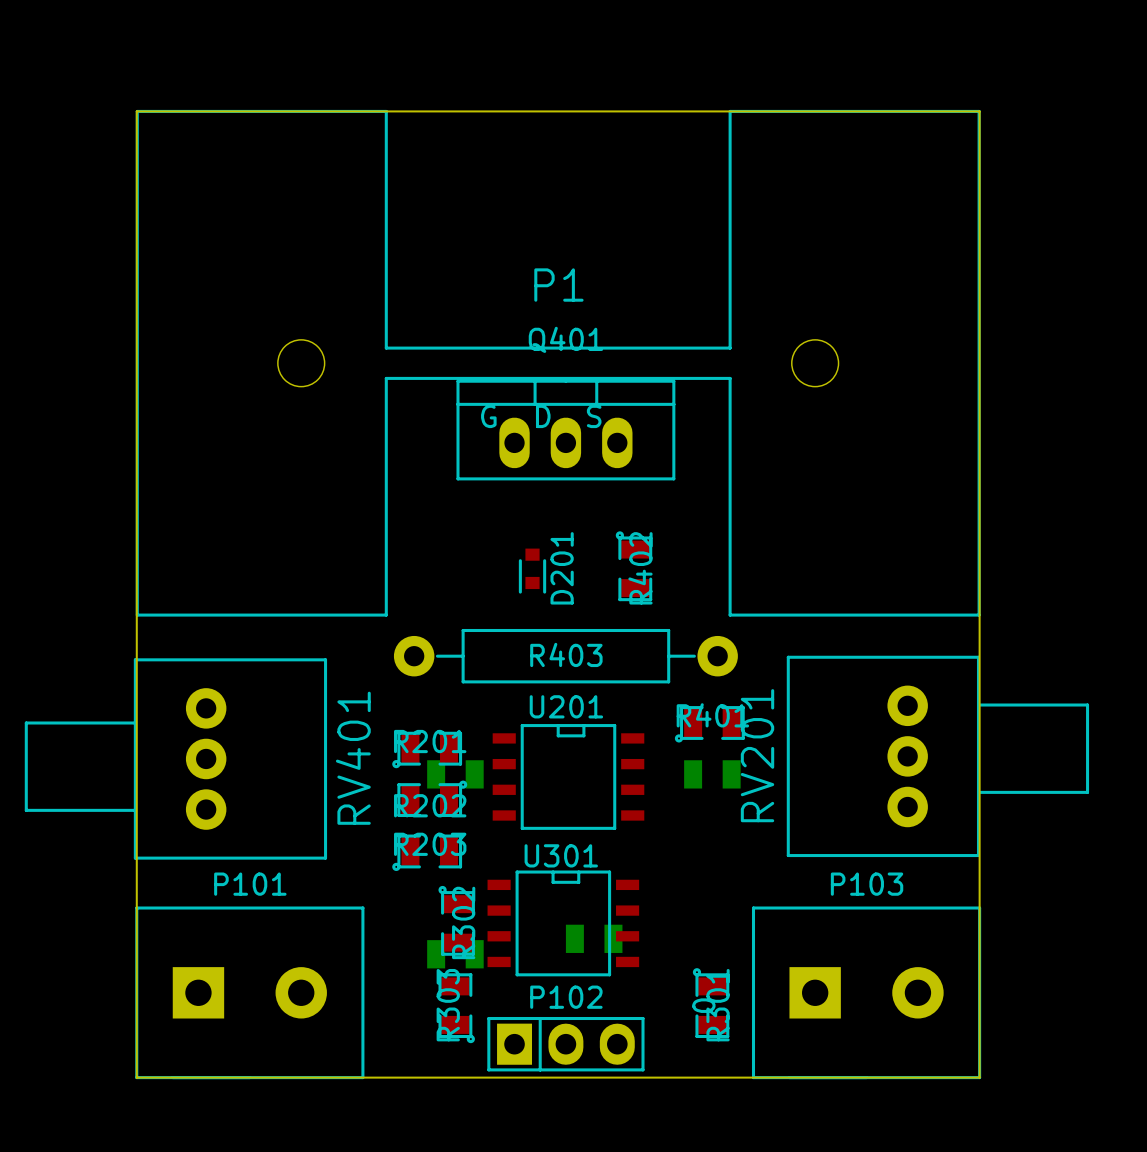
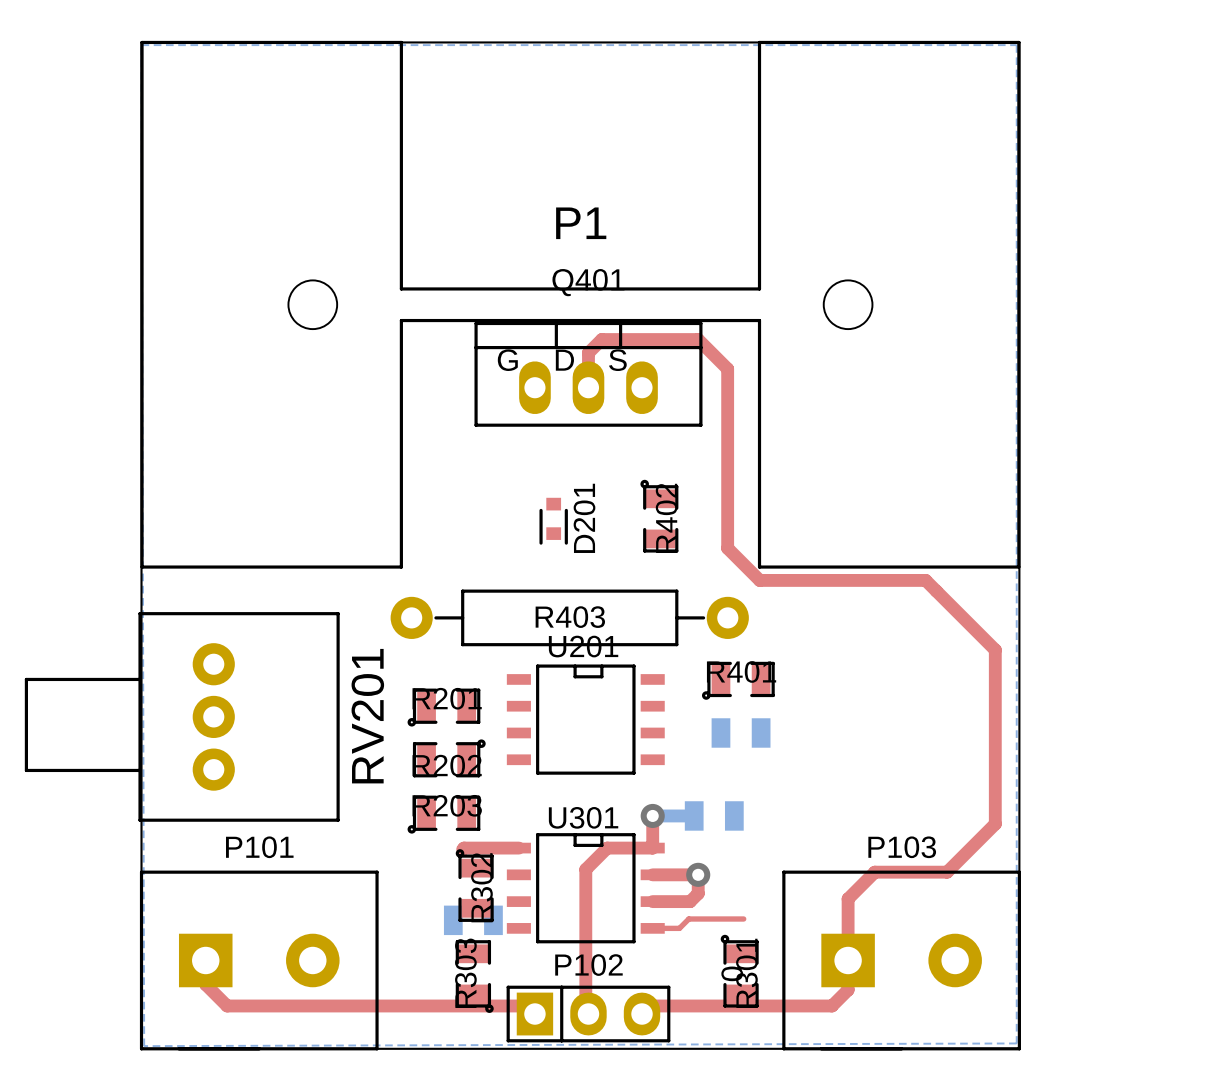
bottom zone outline: none -> (141, 45) (144, 1046) (1016, 1043) (1016, 45) (141, 45)
top track: none -> (588, 387) (588, 352) (601, 339) (698, 339) (727, 368) (727, 548) (759, 580) (925, 580) (995, 650) (995, 823) (947, 872) (874, 872) (848, 898) (848, 989) (832, 1005) (639, 1005)
R403 position: (565, 656) -> (569, 617)
RV201: (937, 756) -> none
RV401 name: RV401 (353, 758) -> RV201 (367, 716)
part: (455, 774) -> none
U201 position: (568, 776) -> (585, 719)
top track: none -> (652, 815) (652, 848) (607, 848) (585, 869) (585, 1005)
bottom track: none -> (652, 815) (694, 815)
via: none -> (652, 815)
part: none -> (714, 815)
top track: none -> (518, 848) (462, 849)
top track: none -> (652, 874) (698, 874) (698, 893) (690, 901) (652, 901)
via: none -> (698, 874)
part: (594, 938) -> none
top track: none -> (743, 919) (688, 919) (679, 928) (652, 928)
top track: none -> (205, 960) (205, 984) (227, 1005) (532, 1005)

